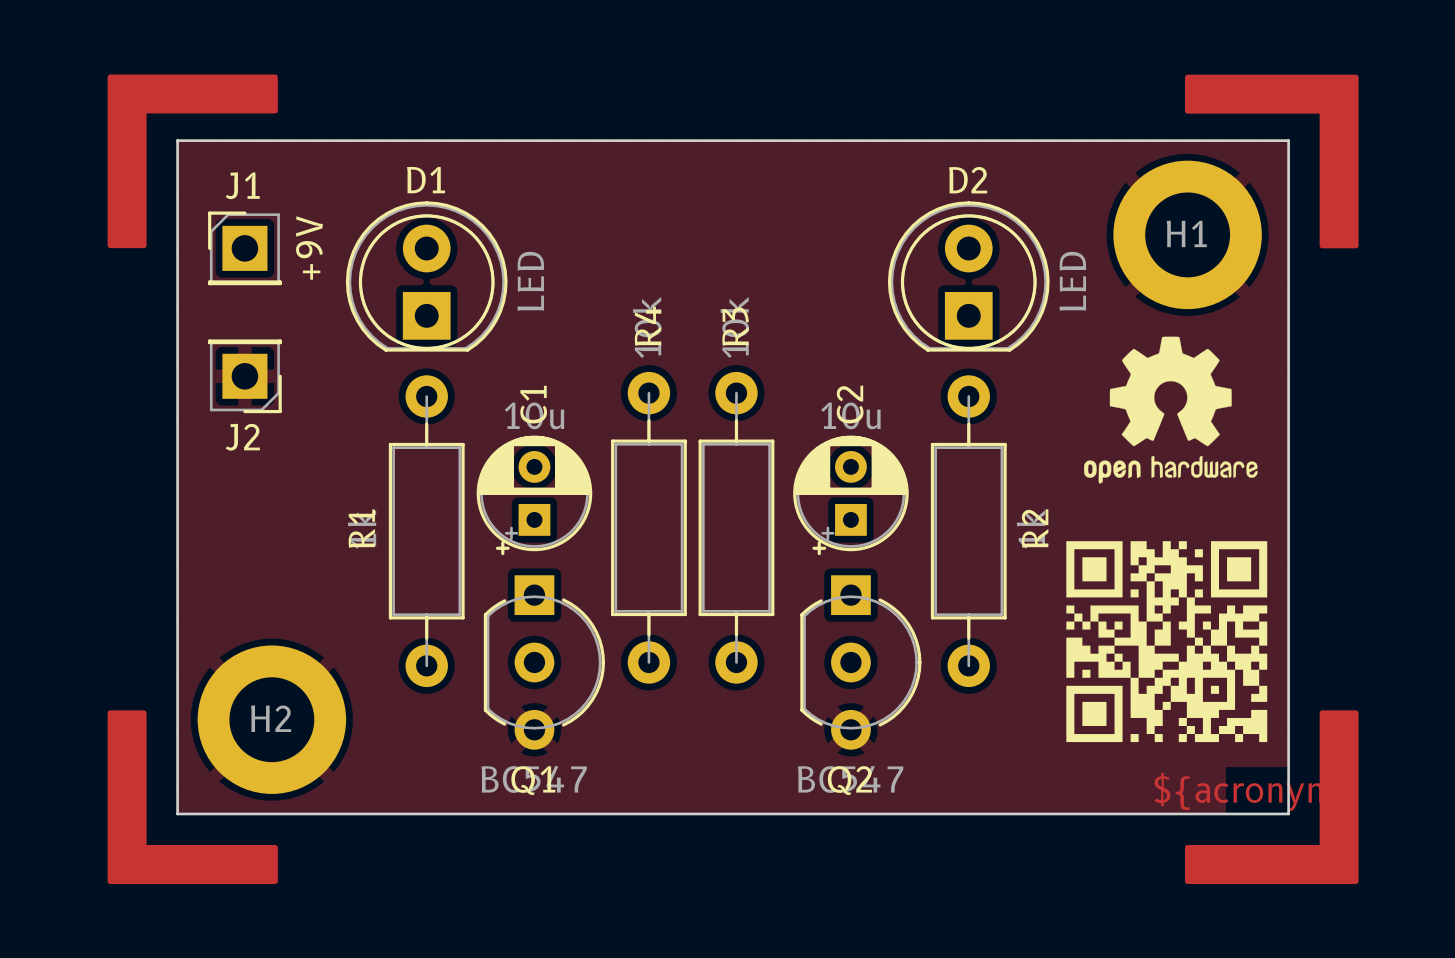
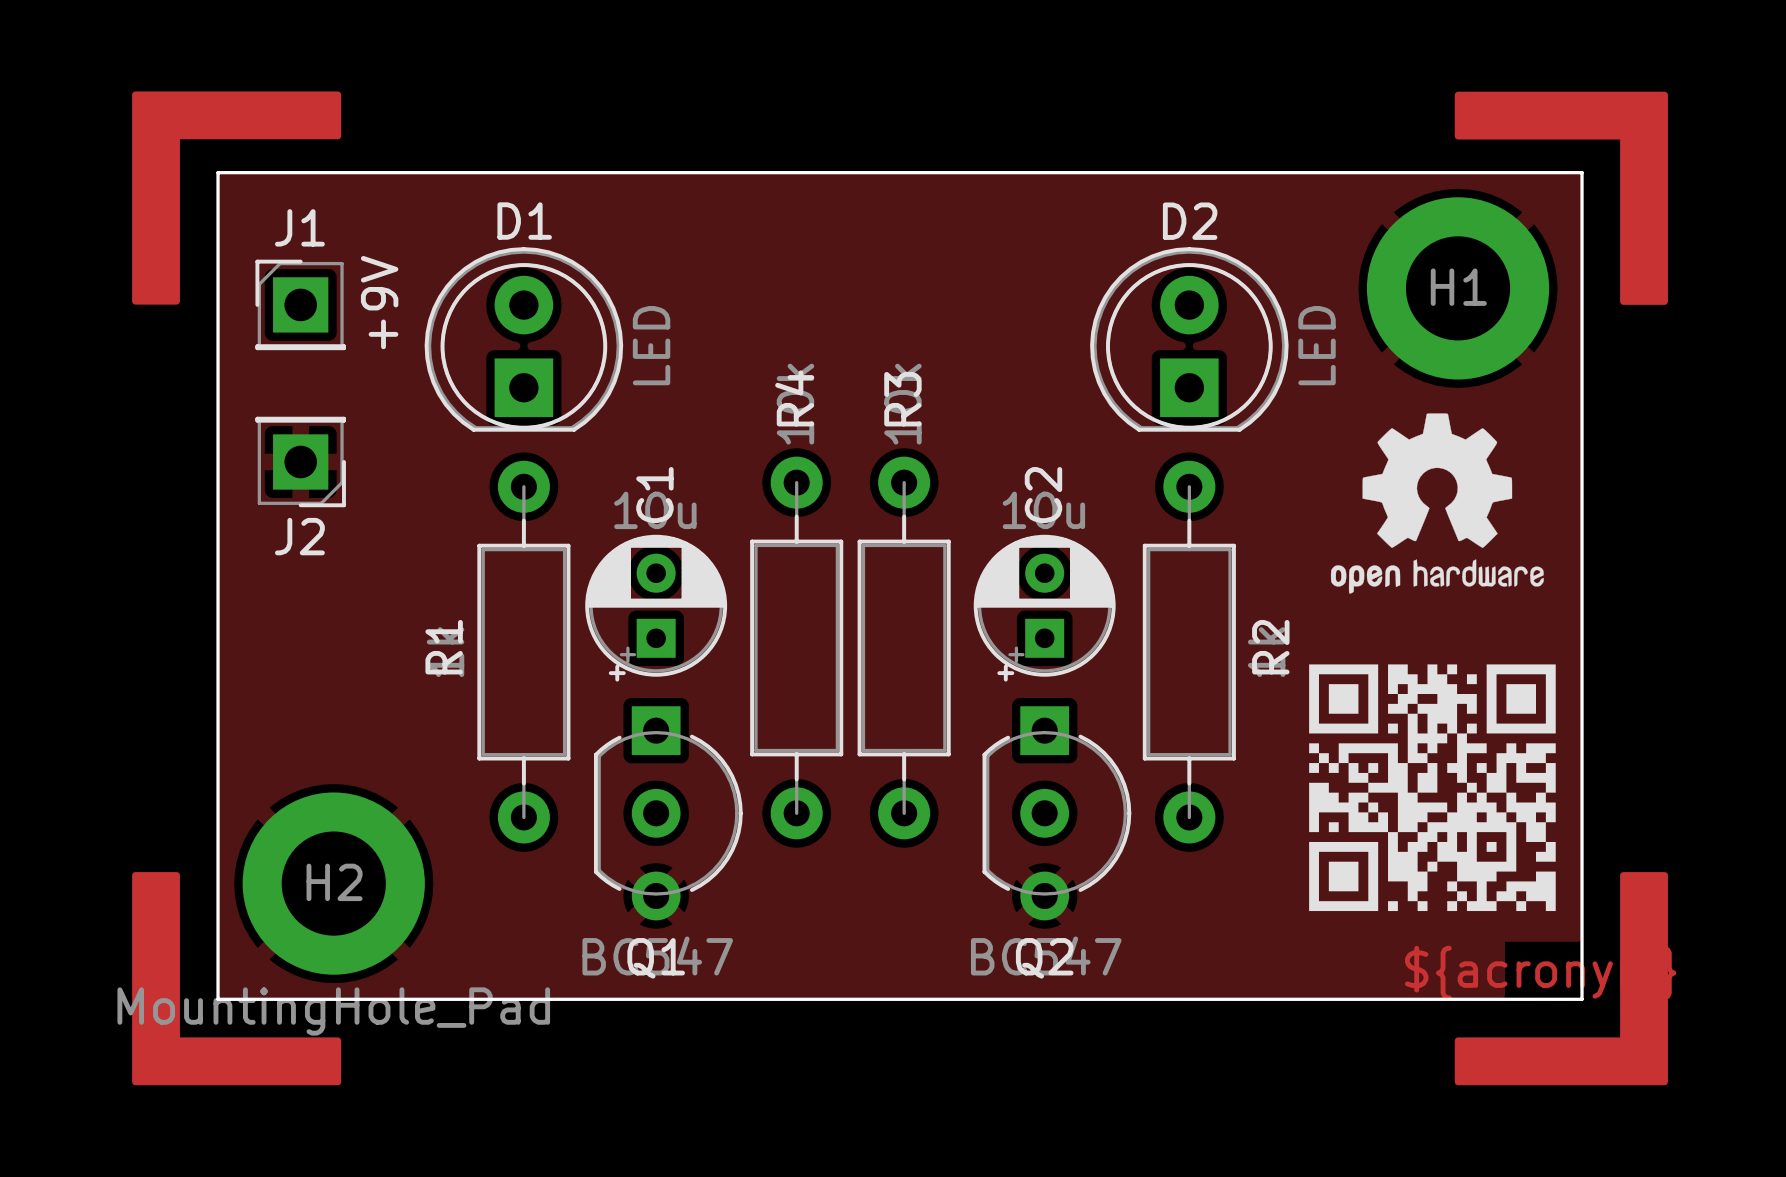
H2 value: none -> MountingHole_Pad (333, 1011)

